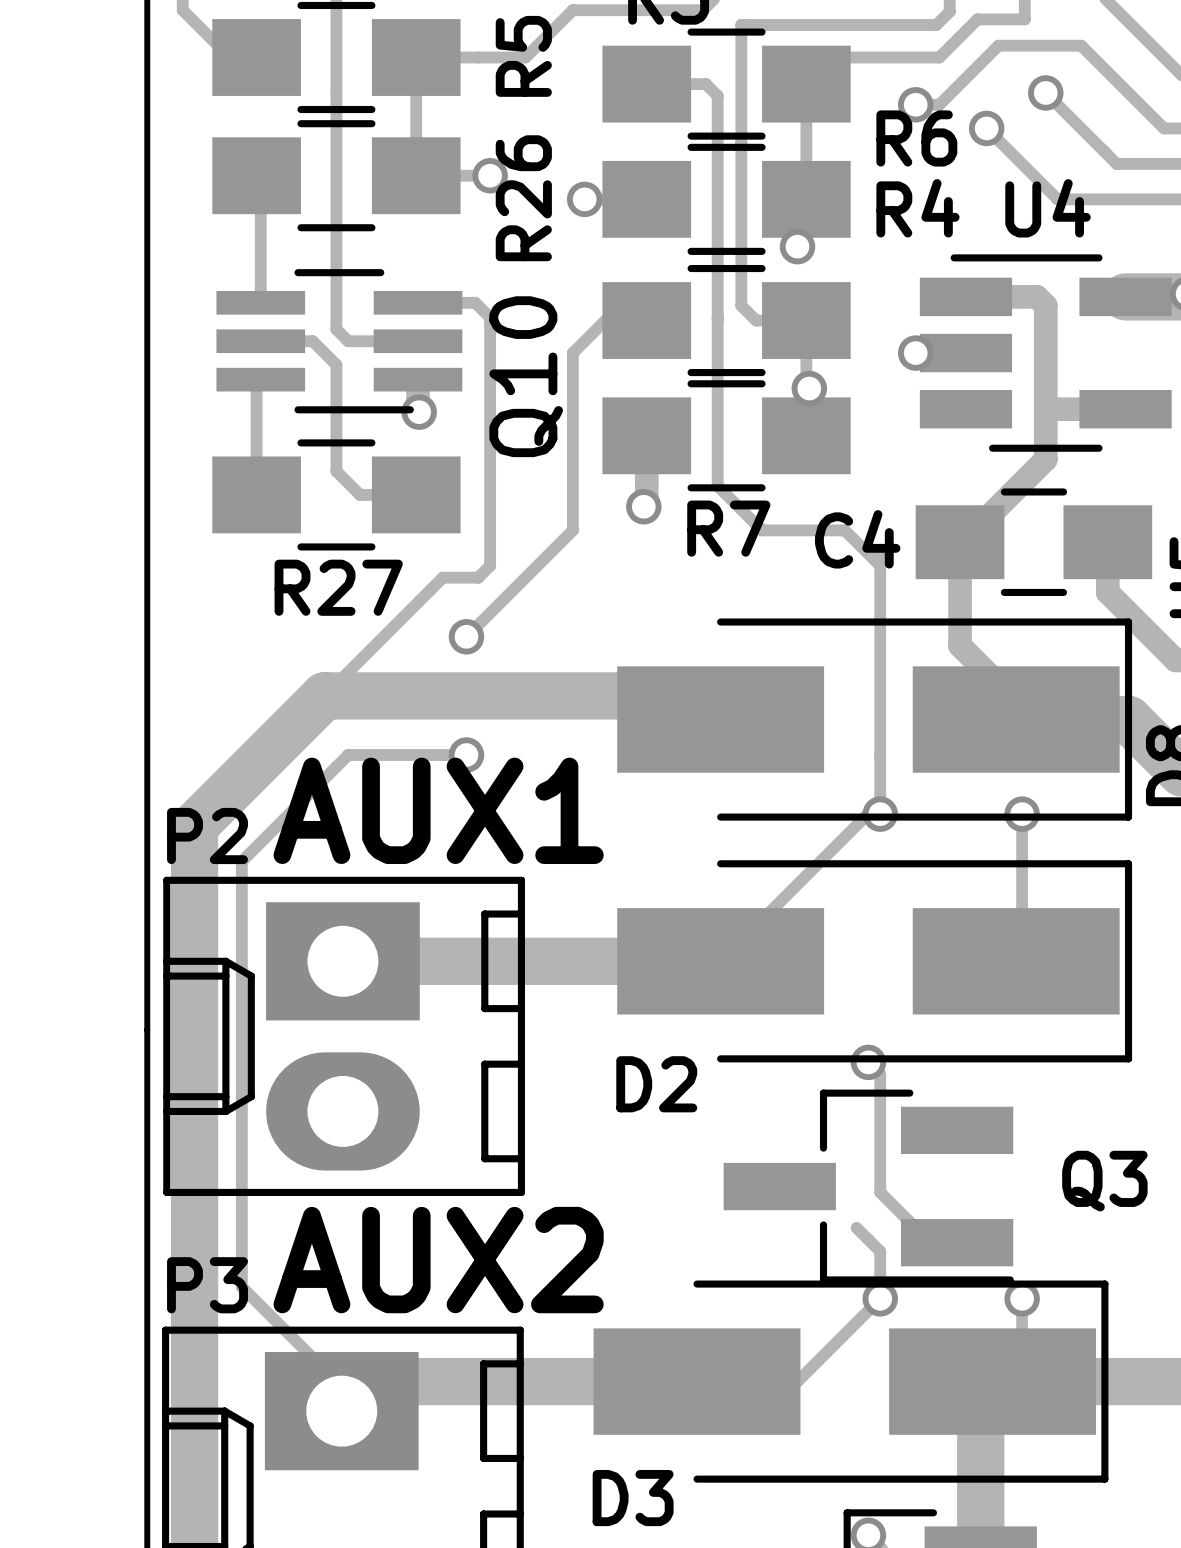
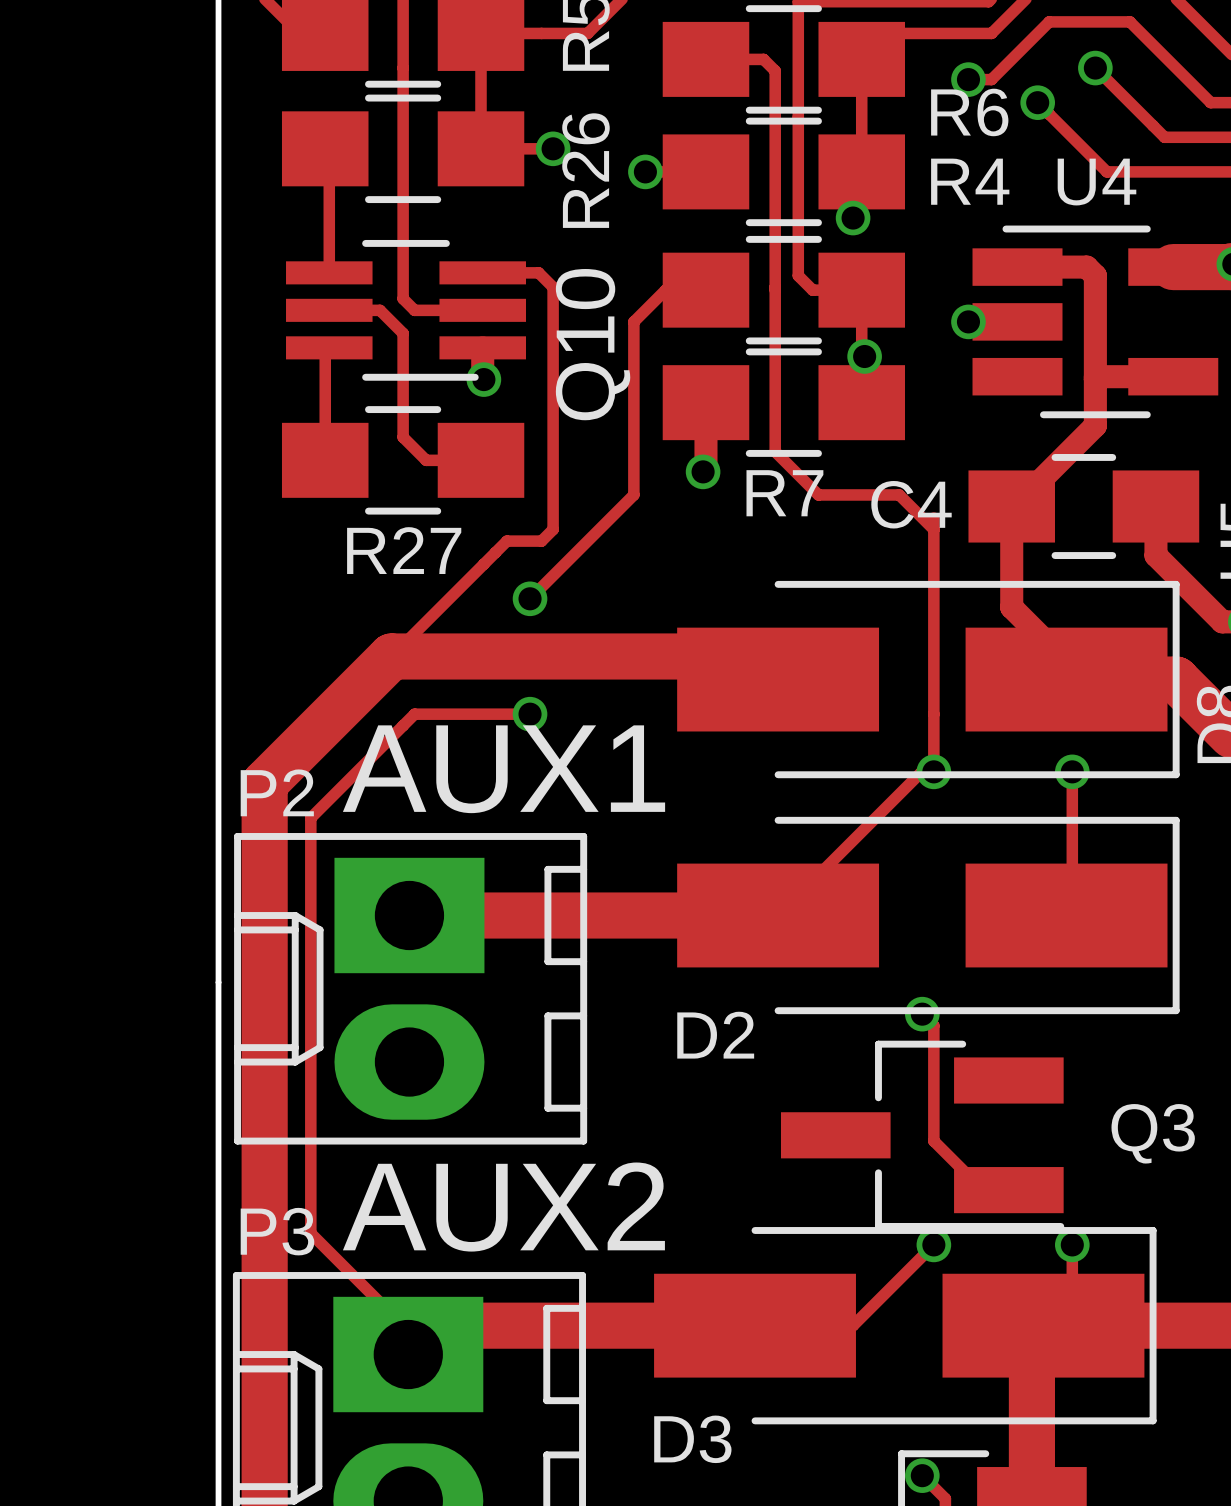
track: (856, 1227) (880, 1251) (880, 1298) -> none

